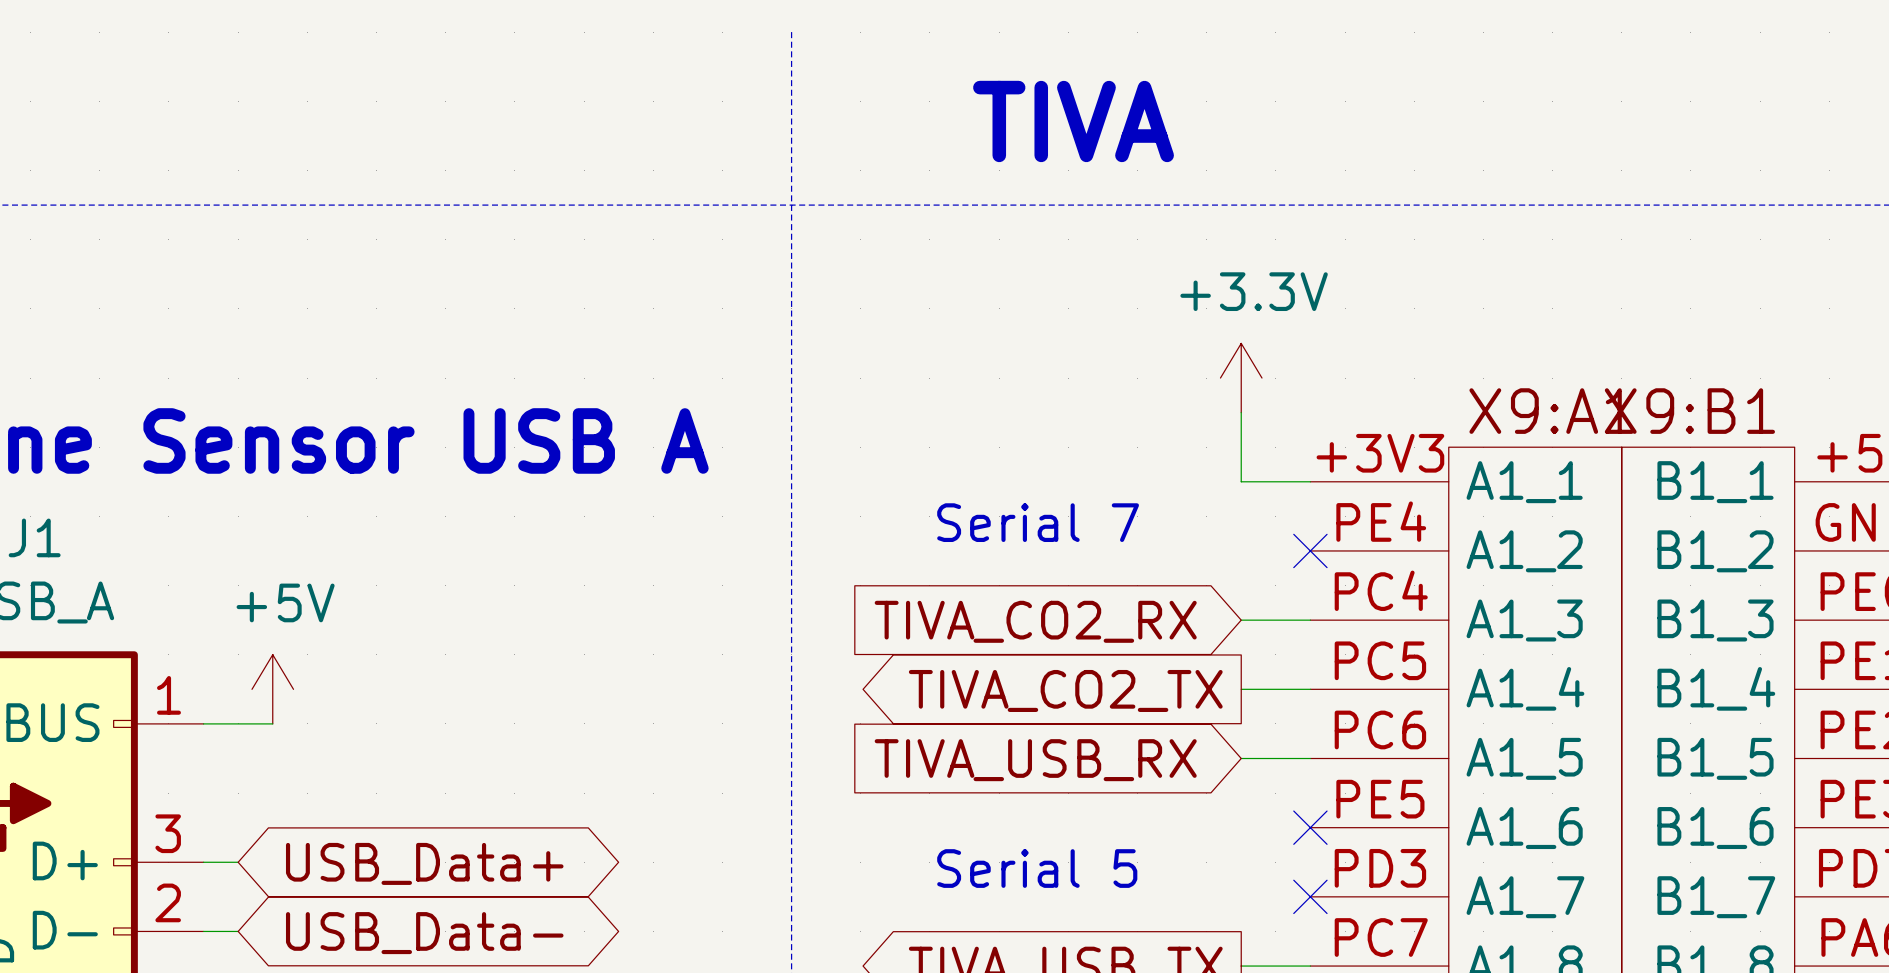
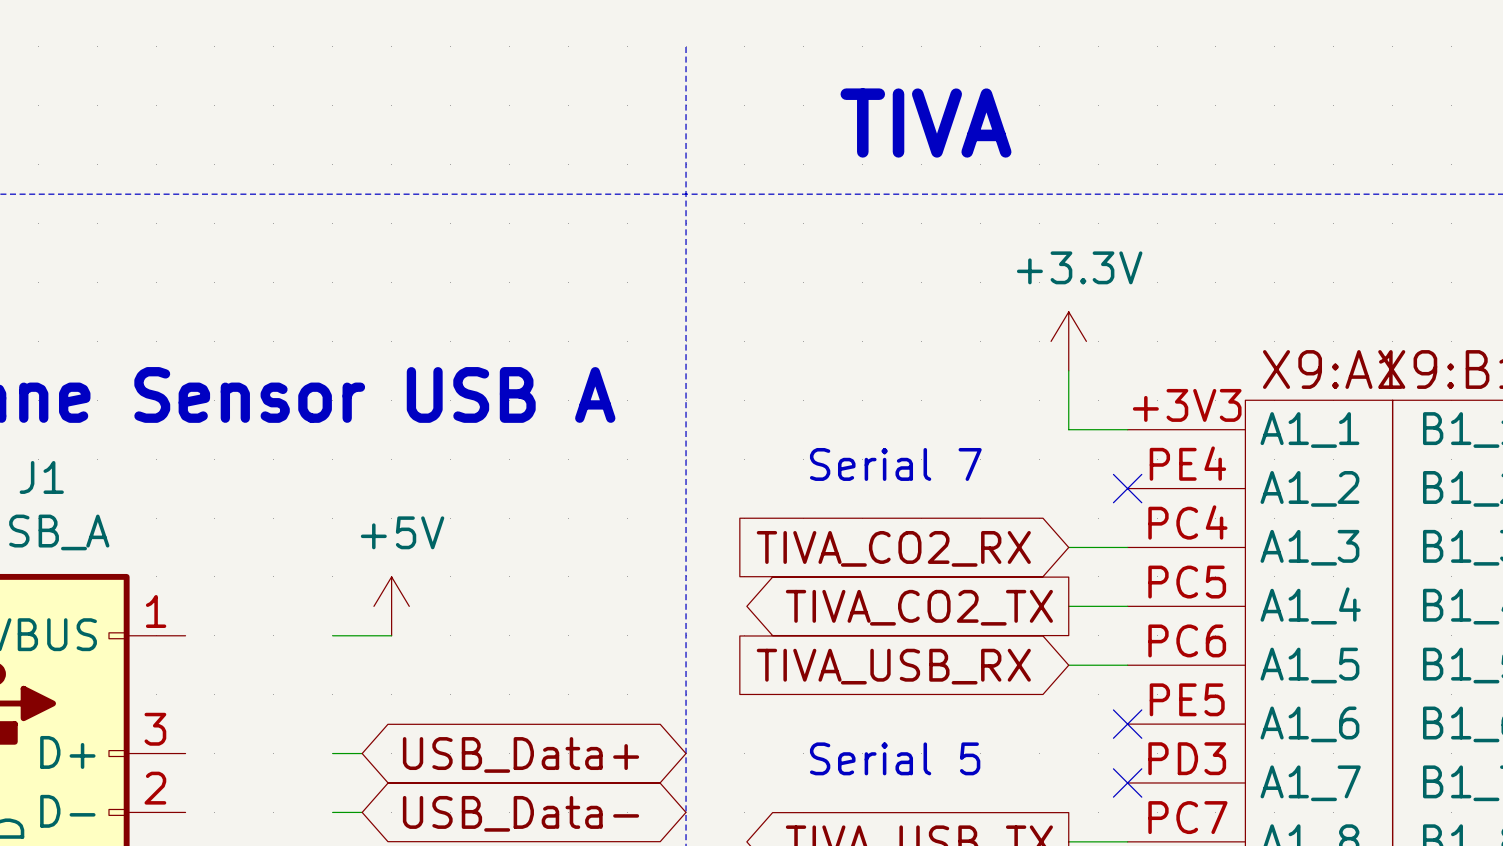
power symbol position: +5V (272, 689) -> +5V (391, 606)
wire: (203, 723) (272, 723) -> (332, 635) (391, 635)
wire: (203, 862) (238, 862) -> (332, 753) (362, 753)
global label position: USB_Data+ (424, 863) -> USB_Data+ (520, 754)
wire: (203, 931) (238, 931) -> (332, 812) (362, 812)
global label position: USB_Data- (424, 933) -> USB_Data- (520, 813)

